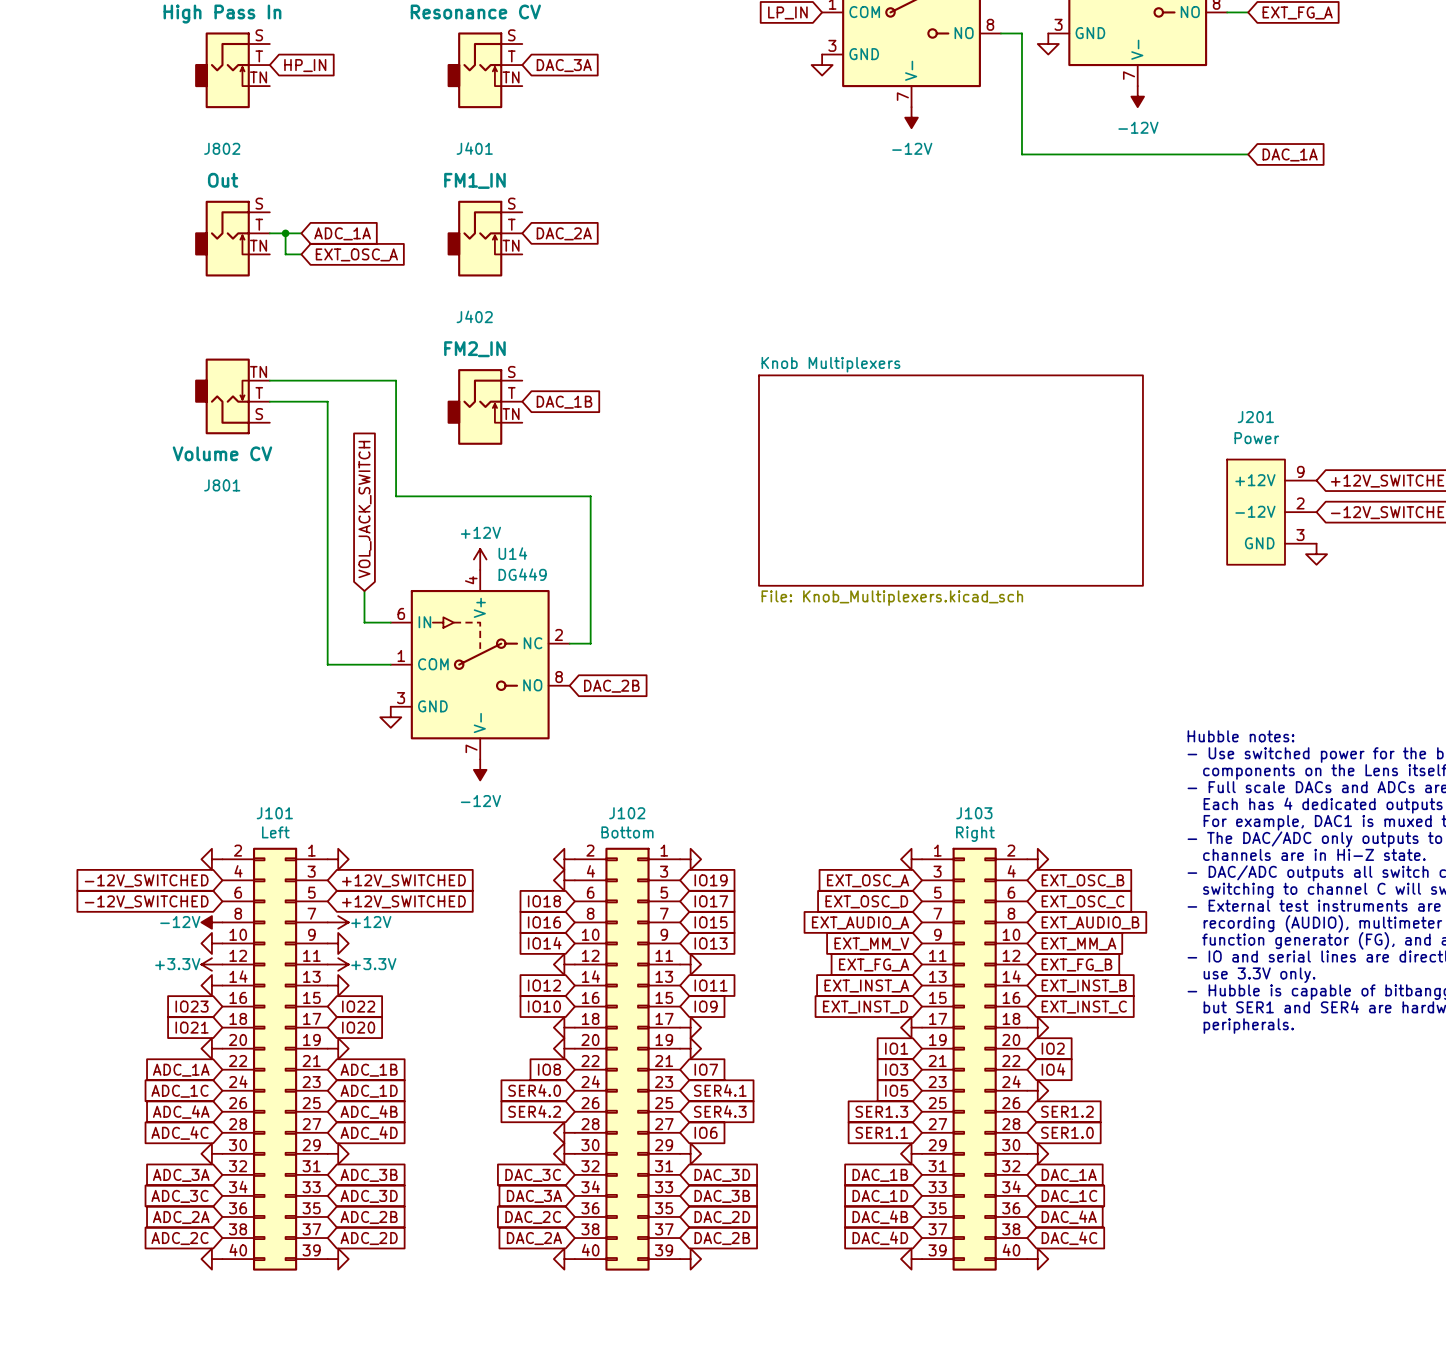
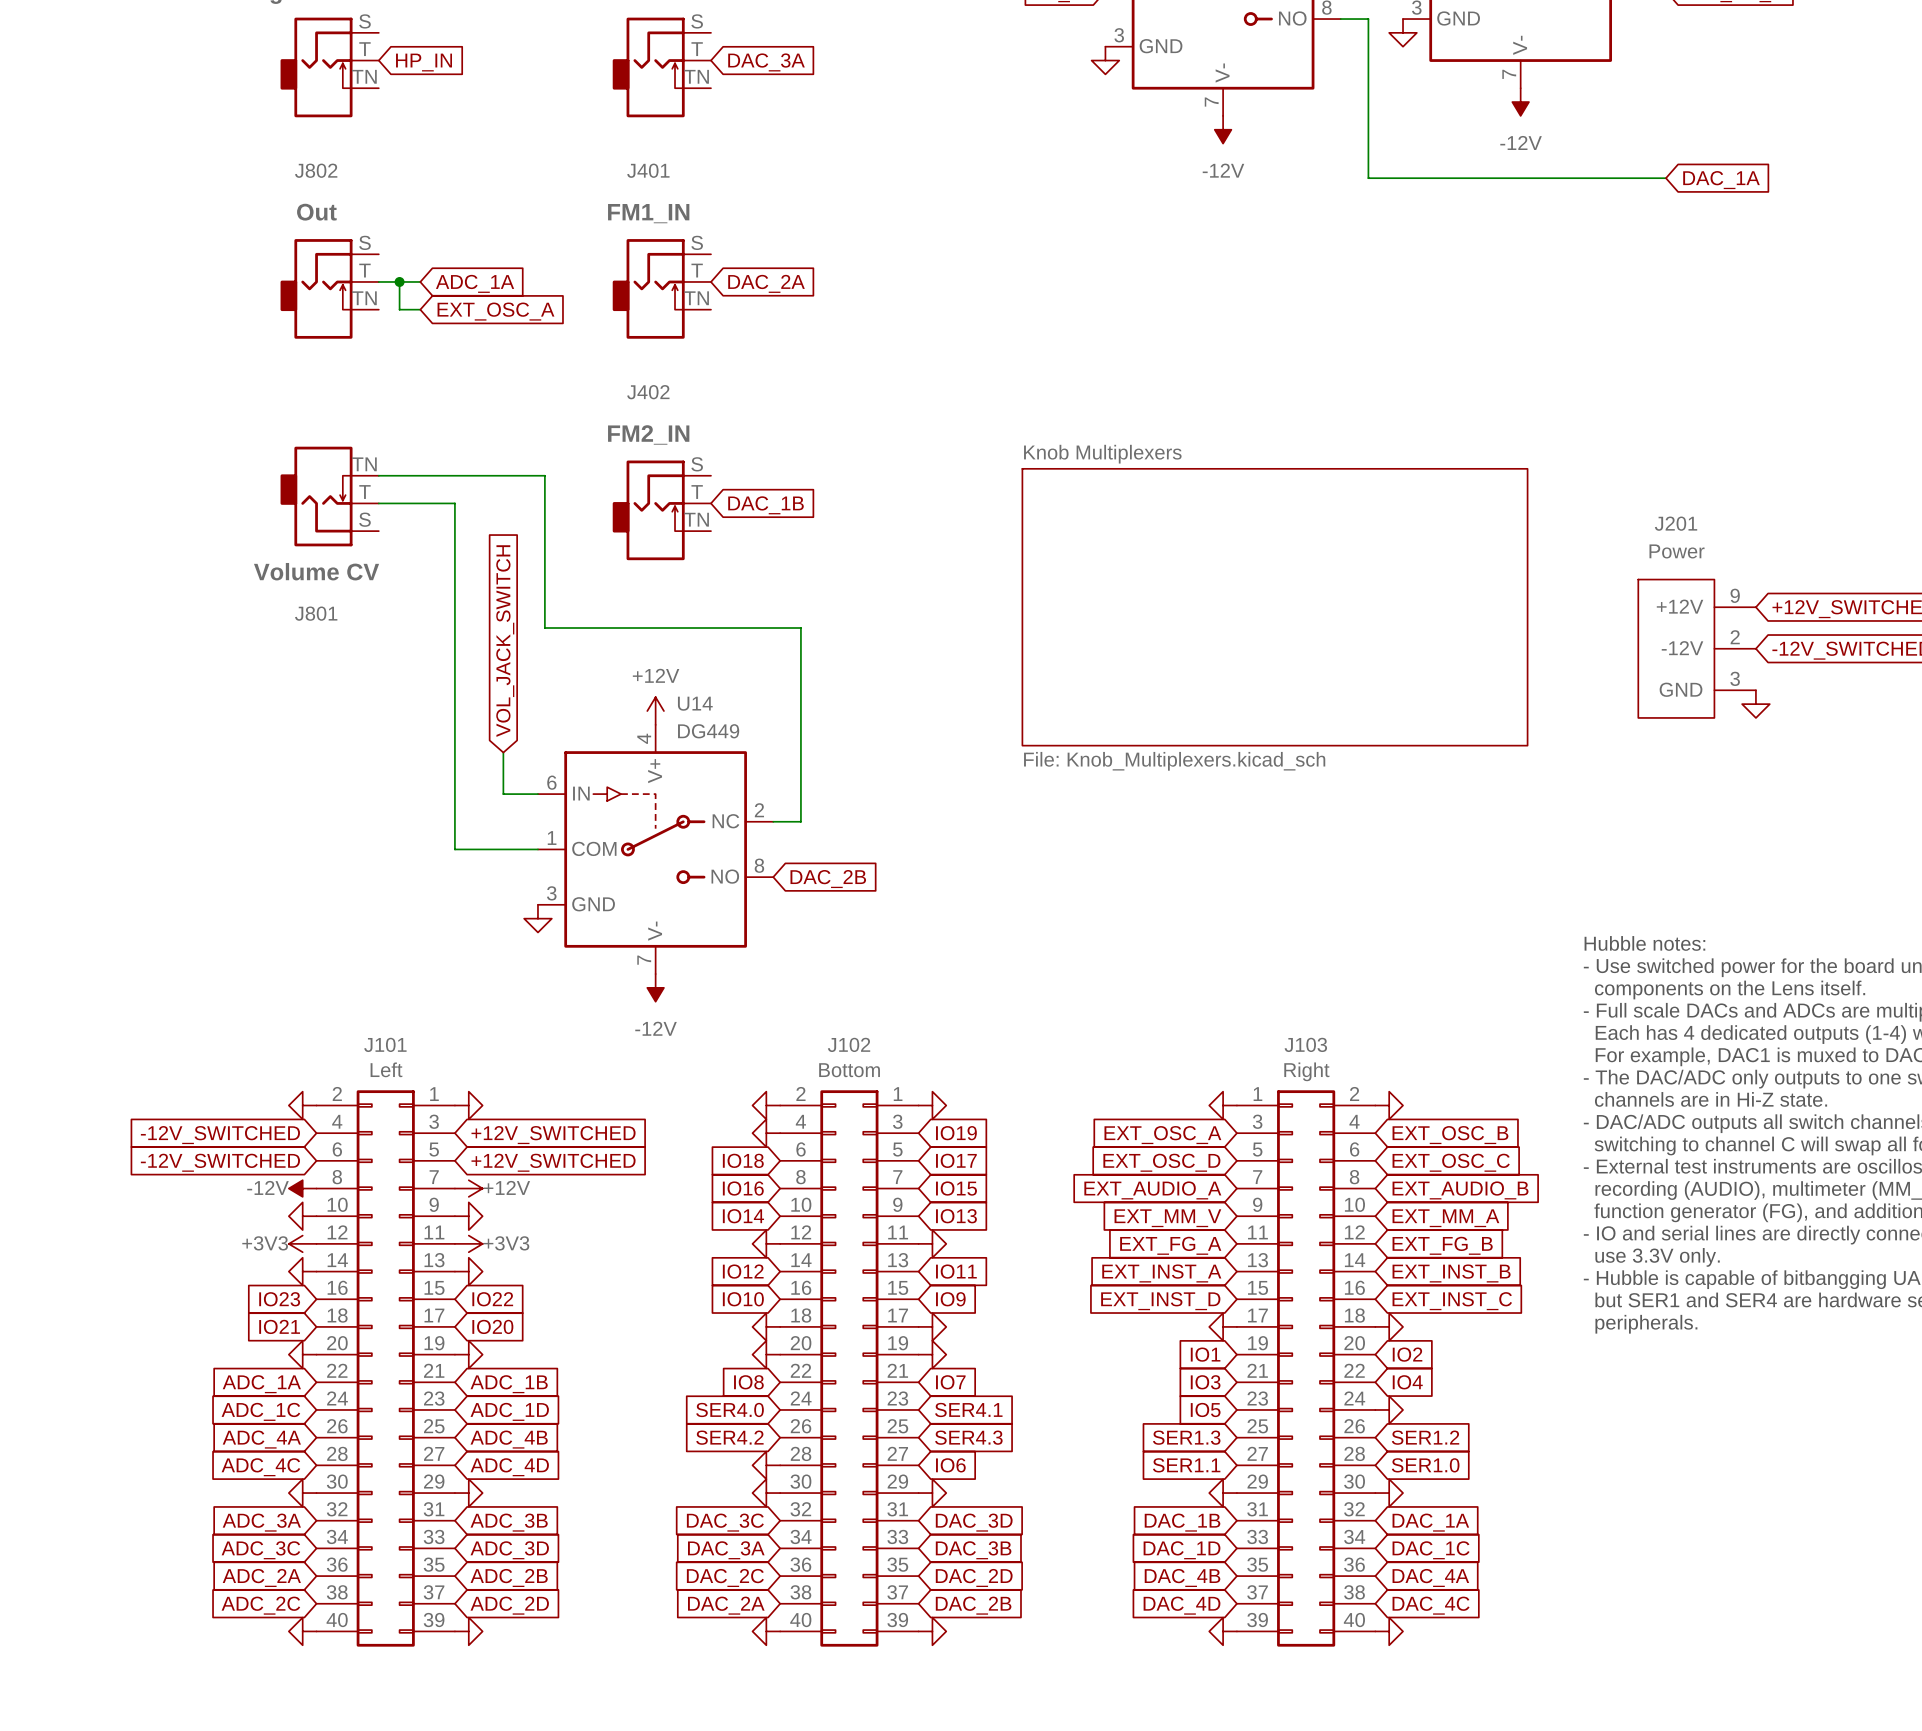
power symbol: +3.3V (211, 964) -> +3V3 (302, 1243)
power symbol: +3.3V (338, 964) -> +3V3 (468, 1243)

